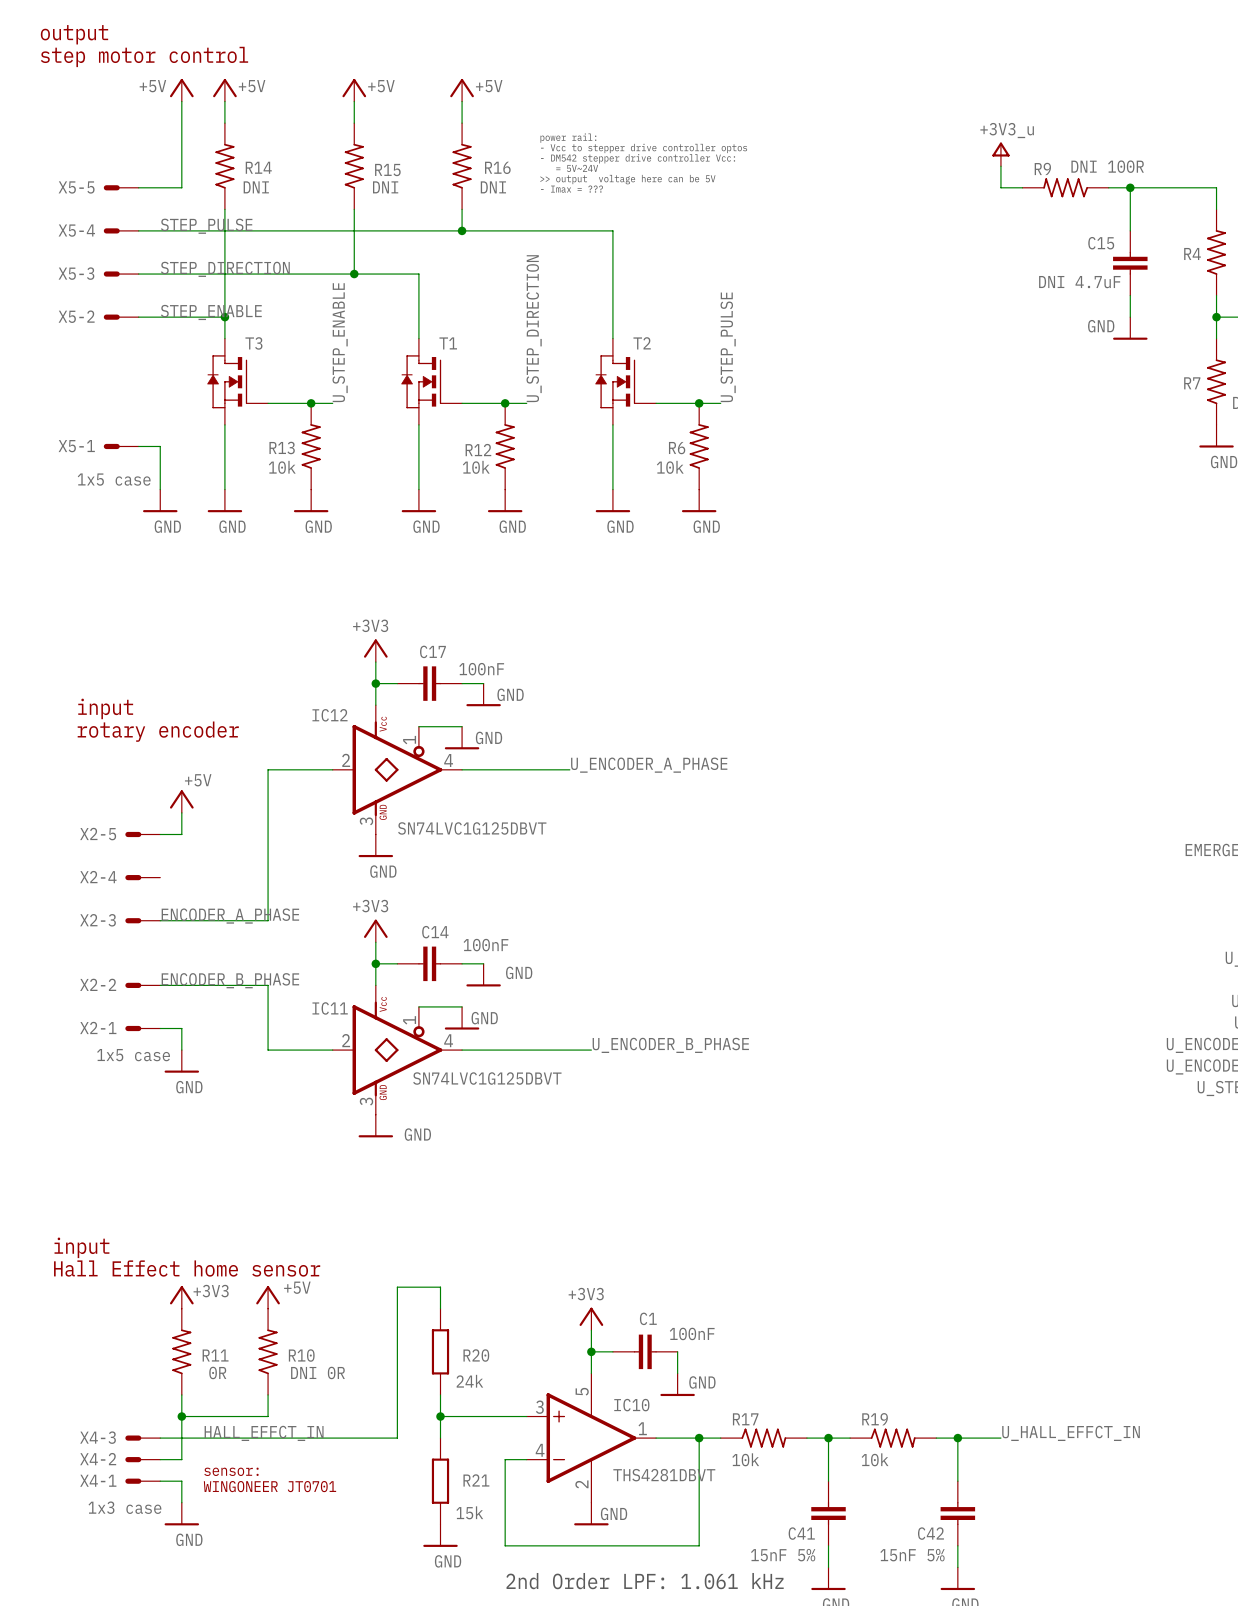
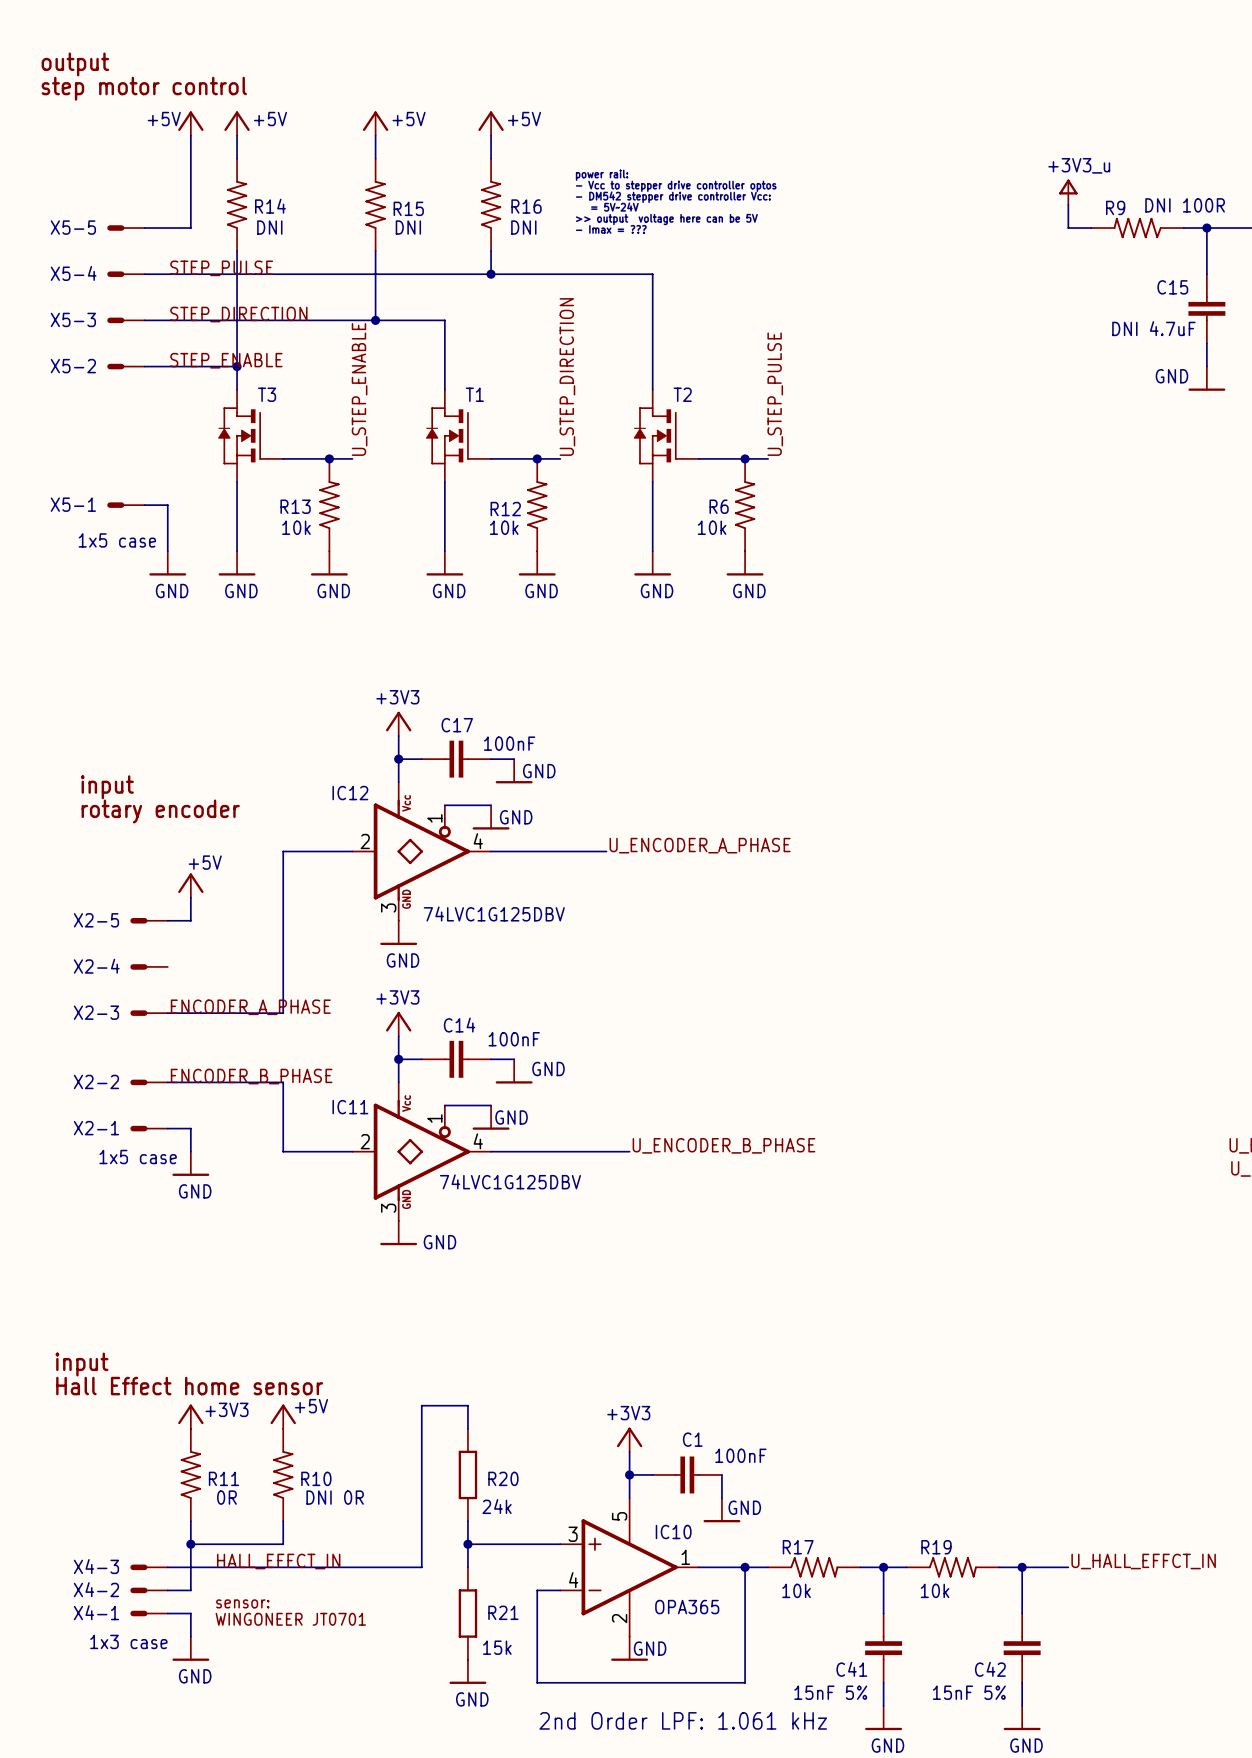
IC12 value: SN74LVC1G125DBVT (472, 828) -> 74LVC1G125DBV (494, 913)
IC11 value: SN74LVC1G125DBVT (487, 1078) -> 74LVC1G125DBV (510, 1181)
IC10 value: THS4281DBVT (664, 1475) -> OPA365 (687, 1607)

